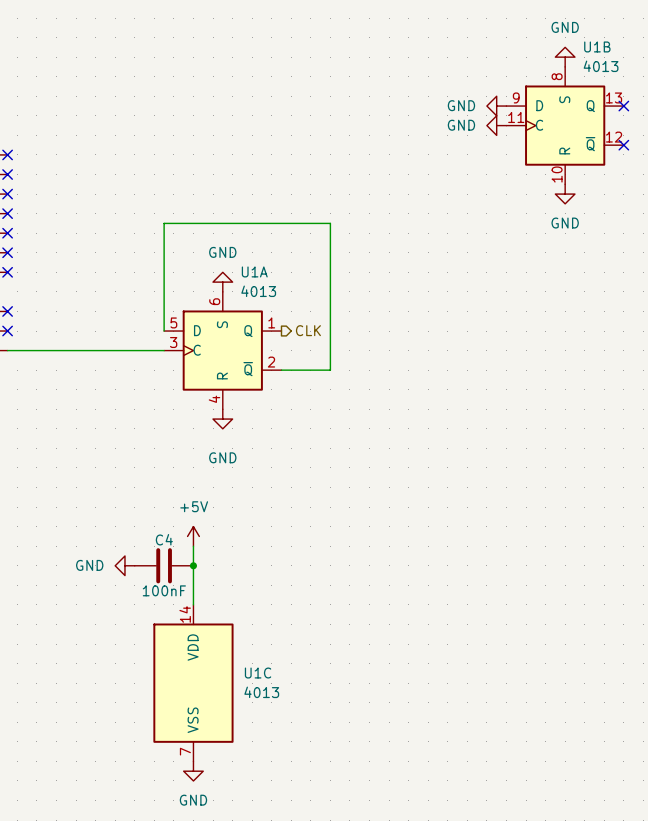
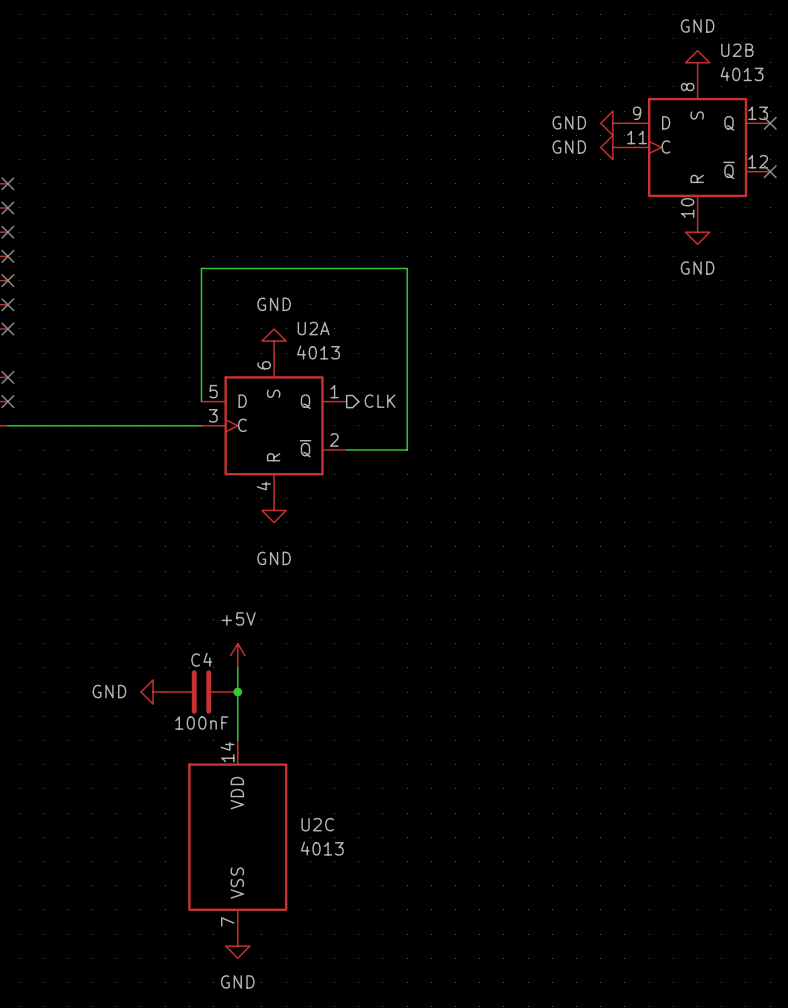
U1B name: U1B (597, 46) -> U2B (737, 50)
U1A name: U1A (254, 271) -> U2A (313, 328)
U1C name: U1C (258, 673) -> U2C (317, 824)

